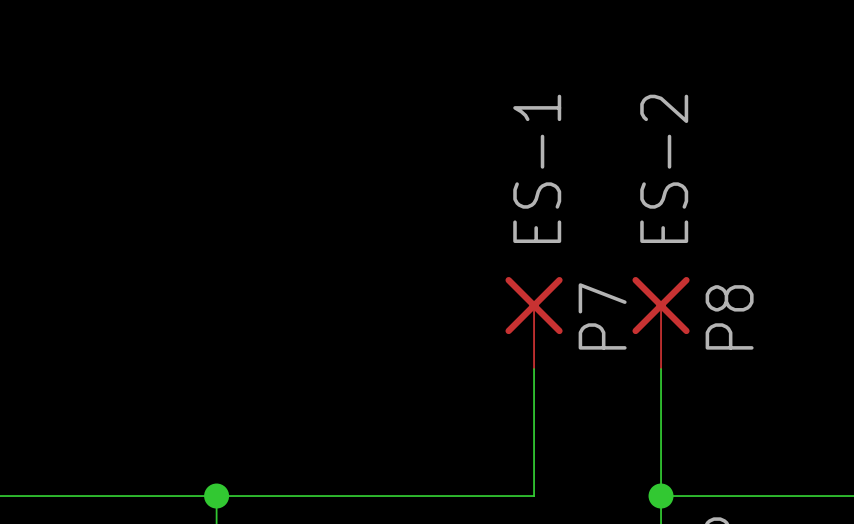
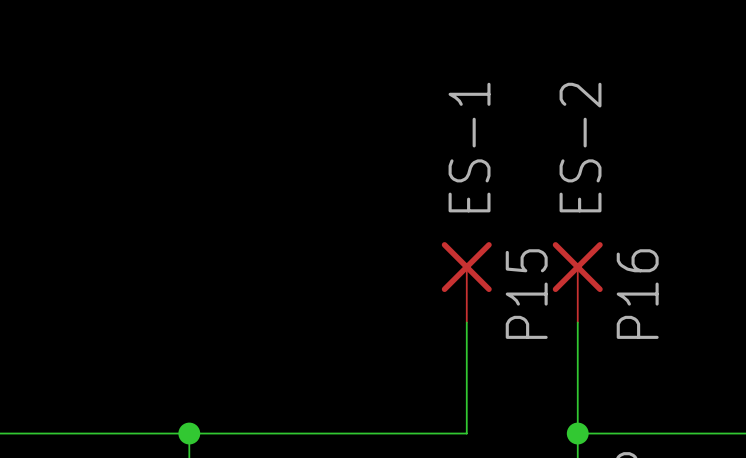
P7 name: P7 (602, 316) -> P15 (526, 294)
P8 name: P8 (729, 317) -> P16 (637, 294)

